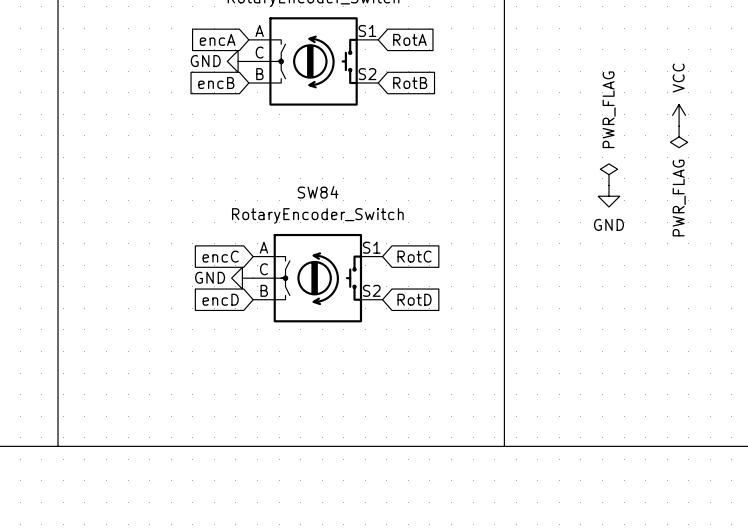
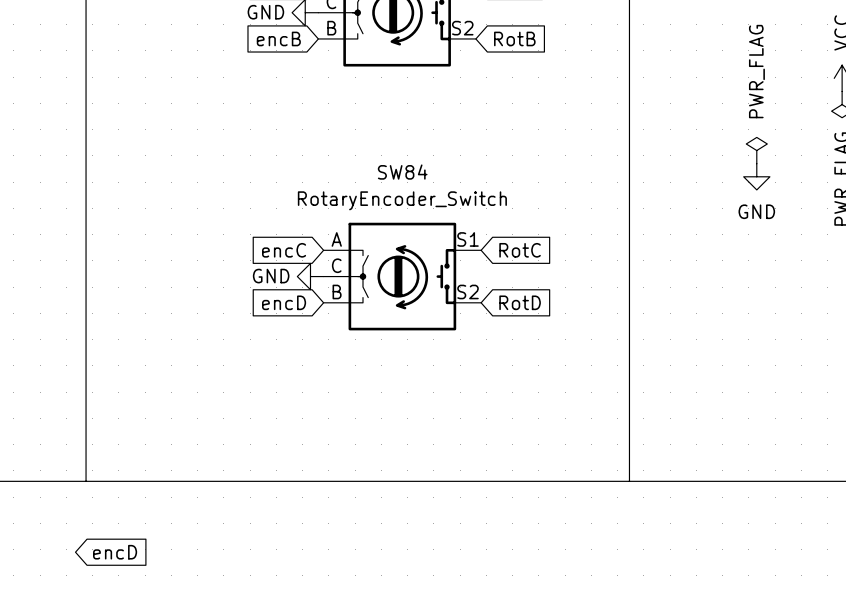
global label: none -> encD (115, 552)

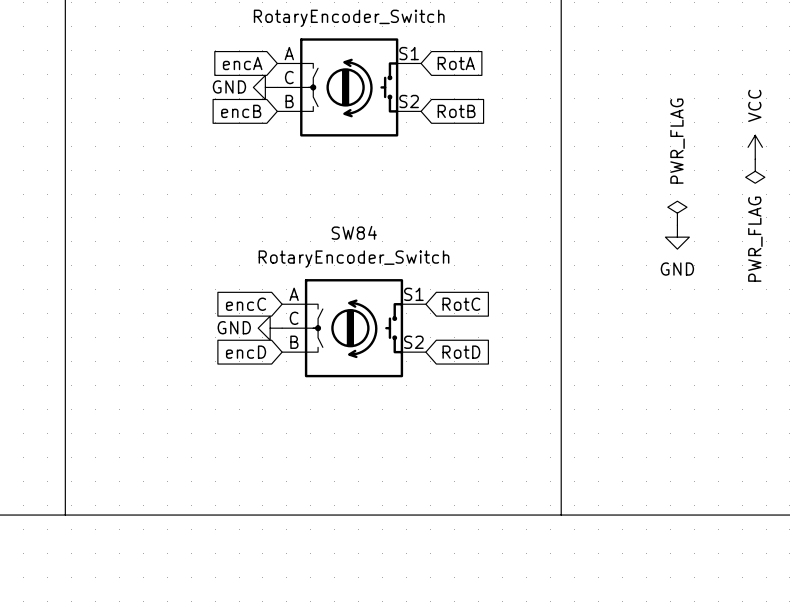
global label: encD (115, 552) -> none

